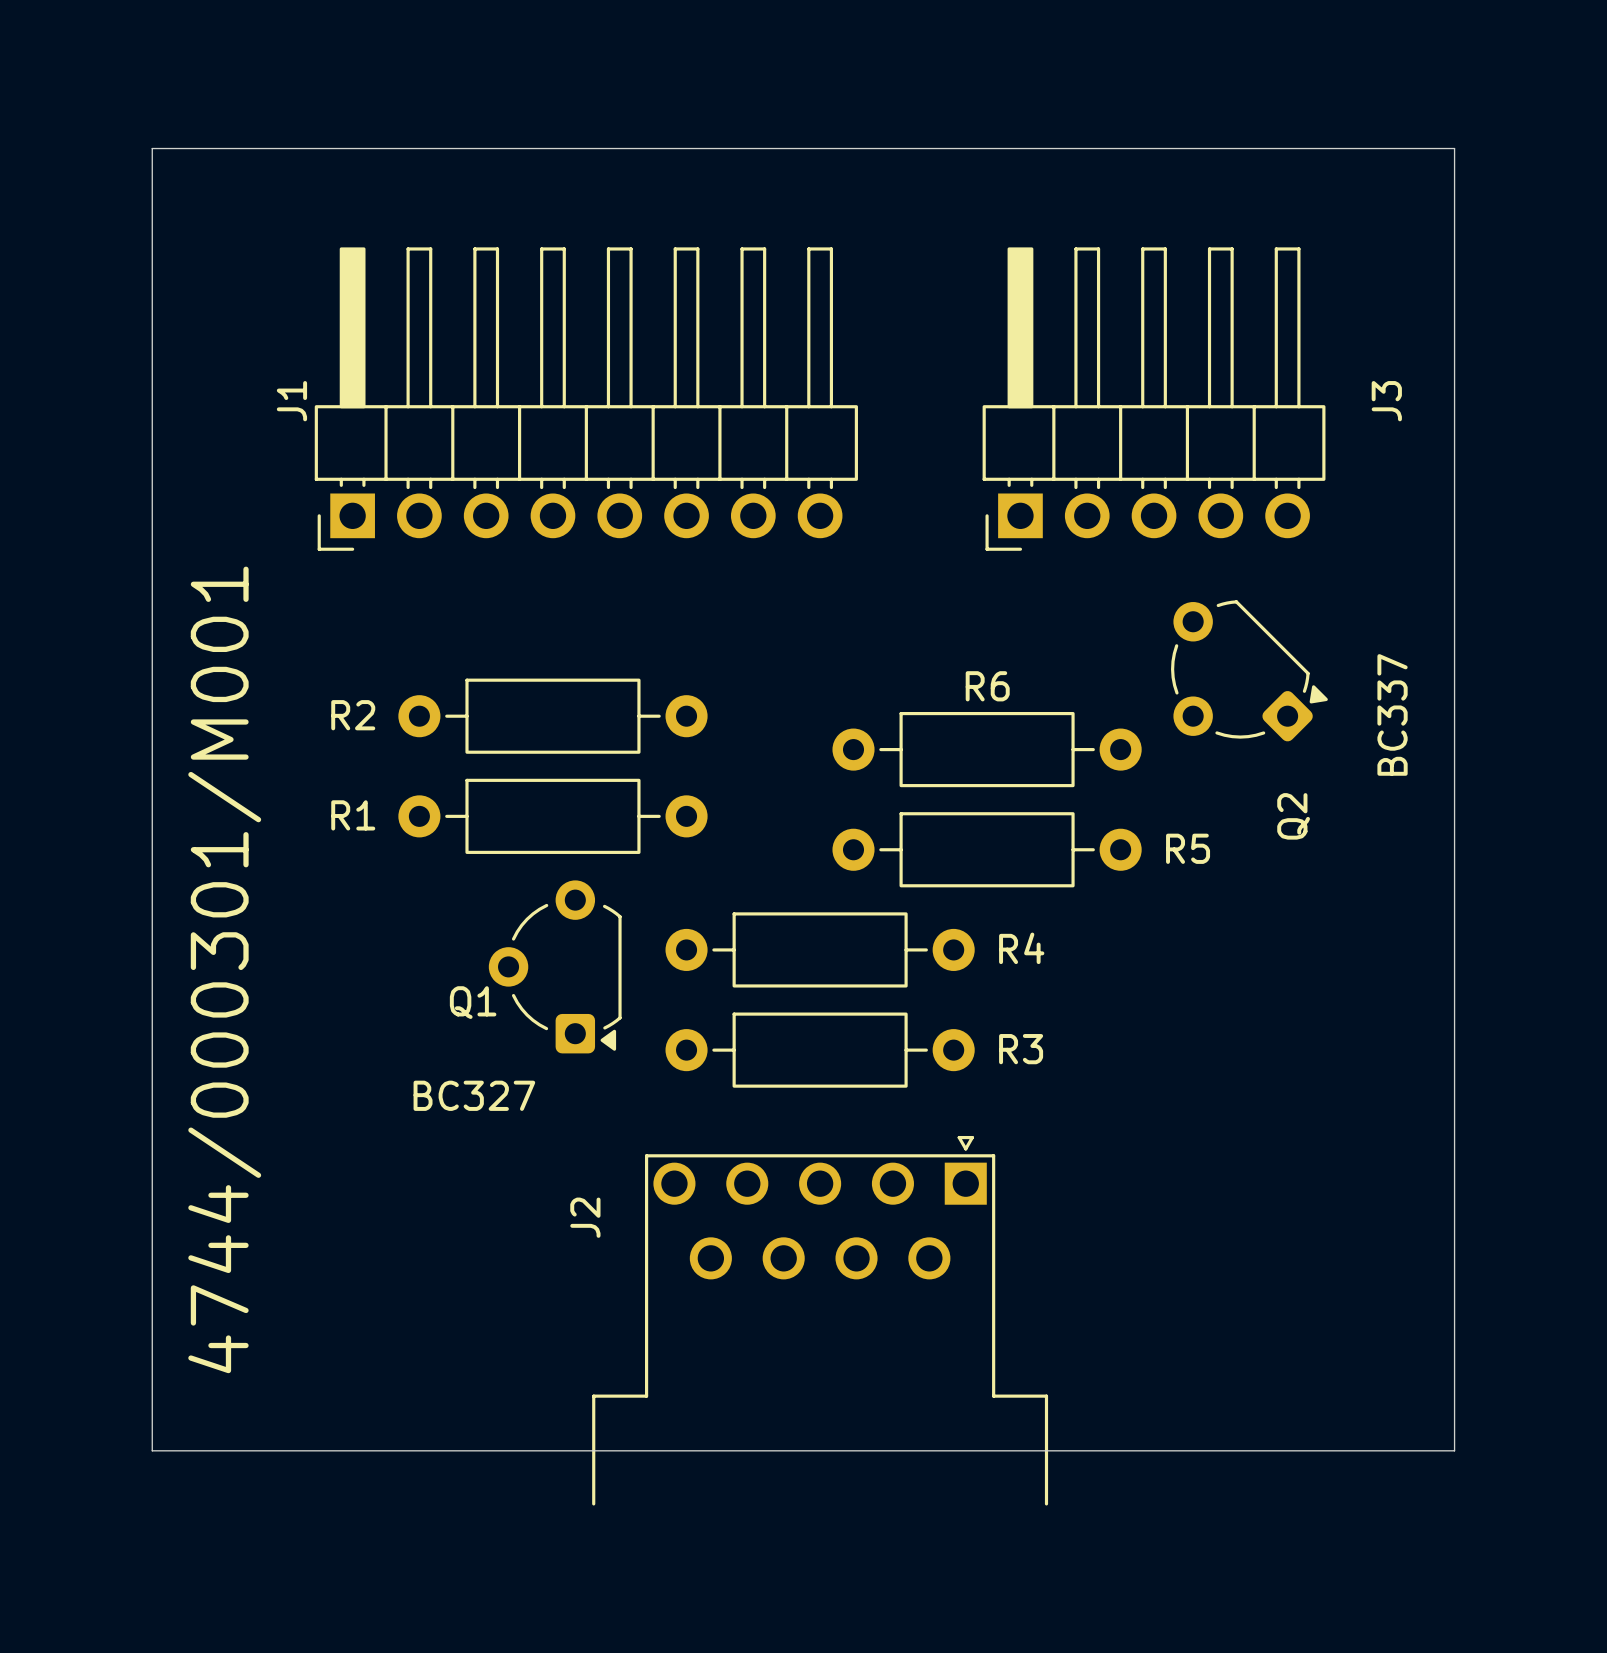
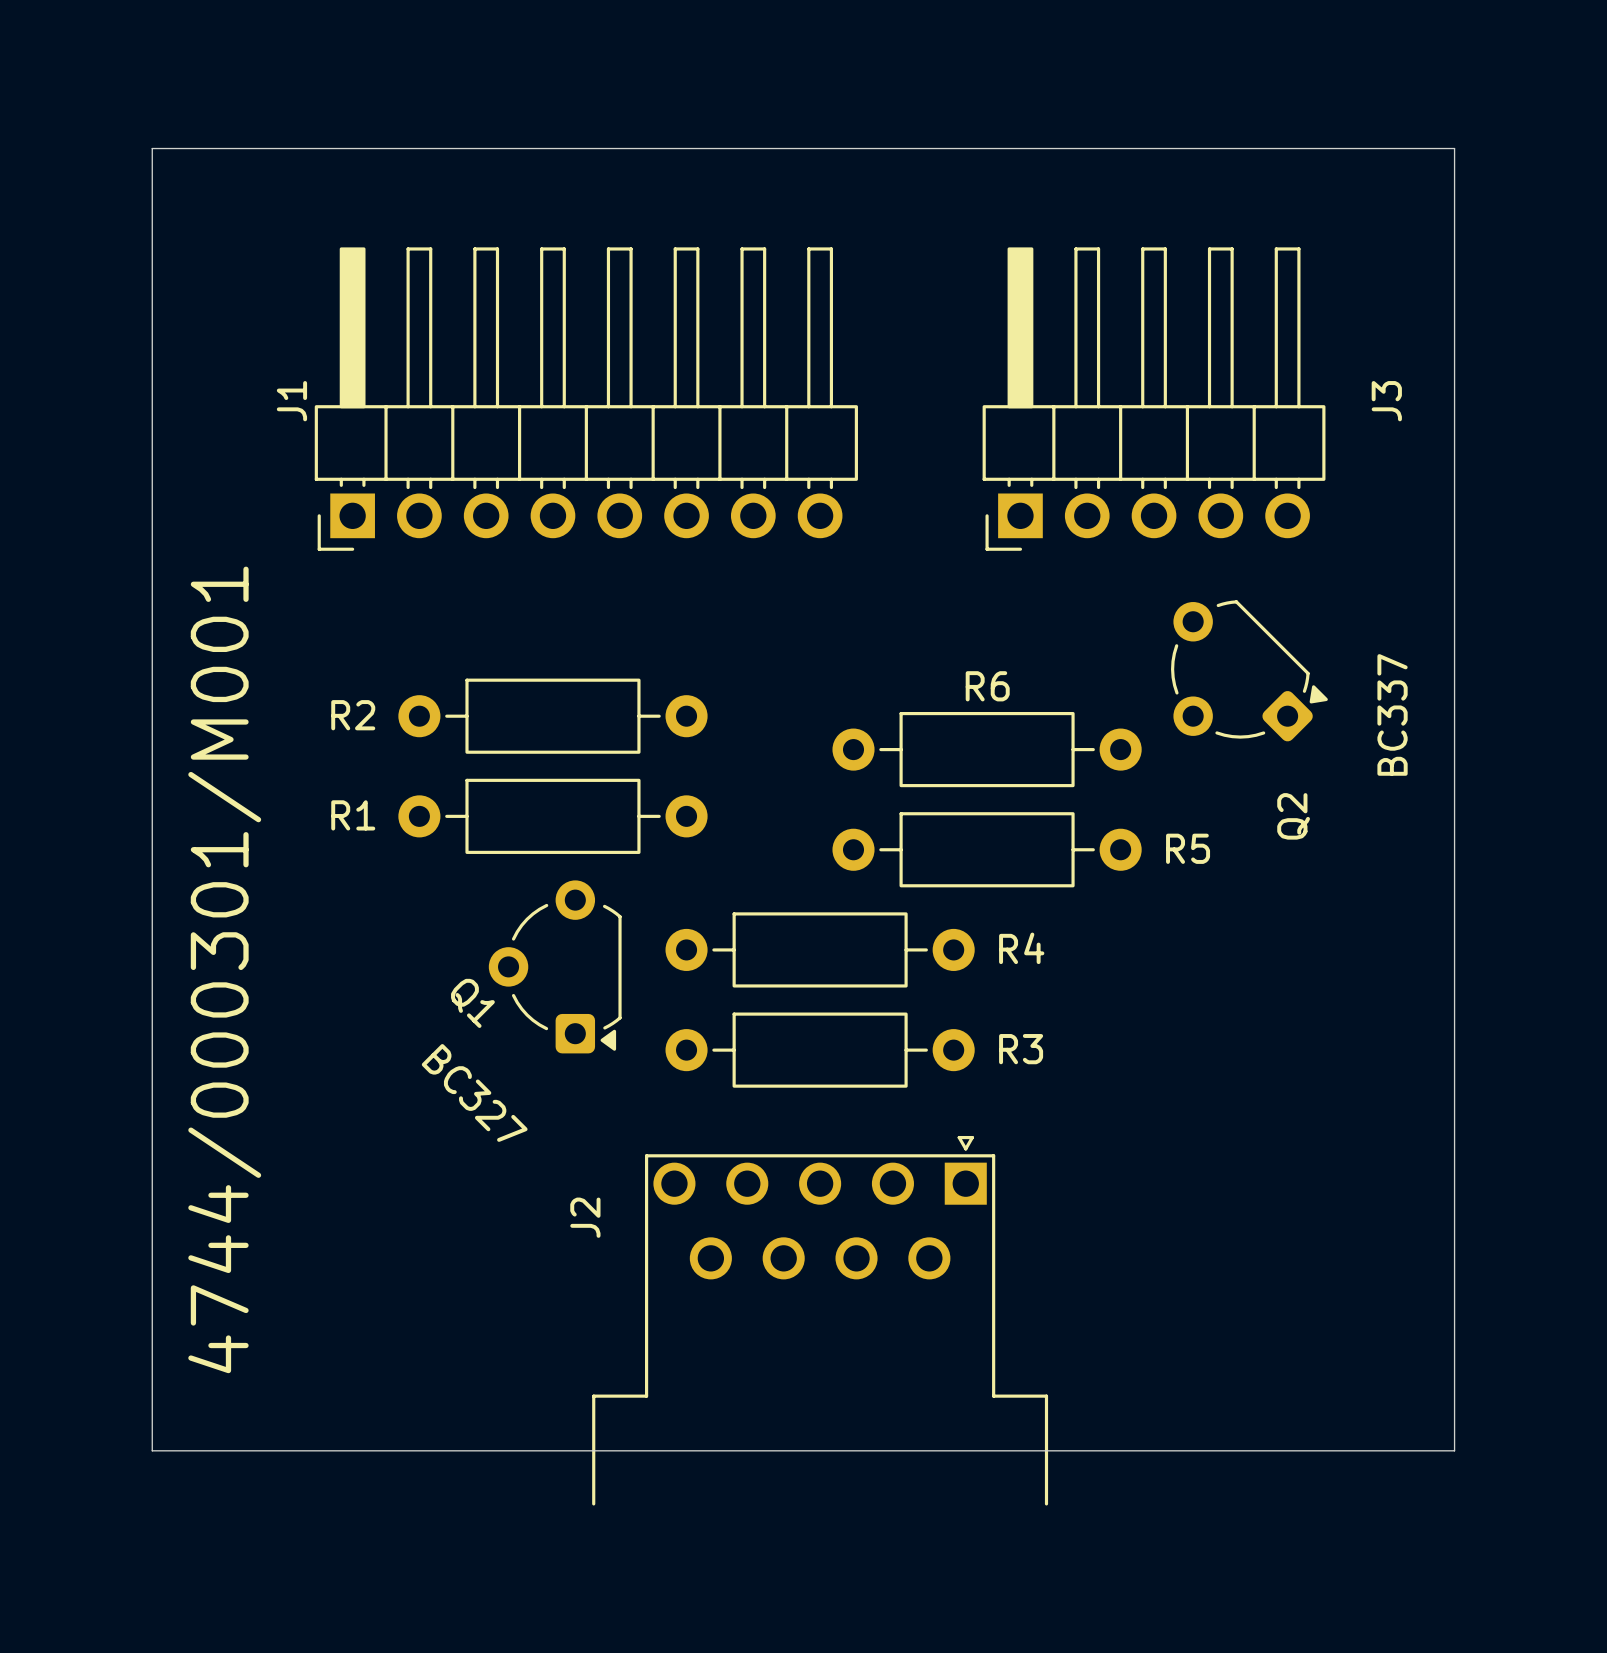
Q1 name rotation: 0° (473, 1002) -> 45° clockwise (472, 1003)
Q1 value rotation: 0° (474, 1095) -> 45° clockwise (474, 1092)

